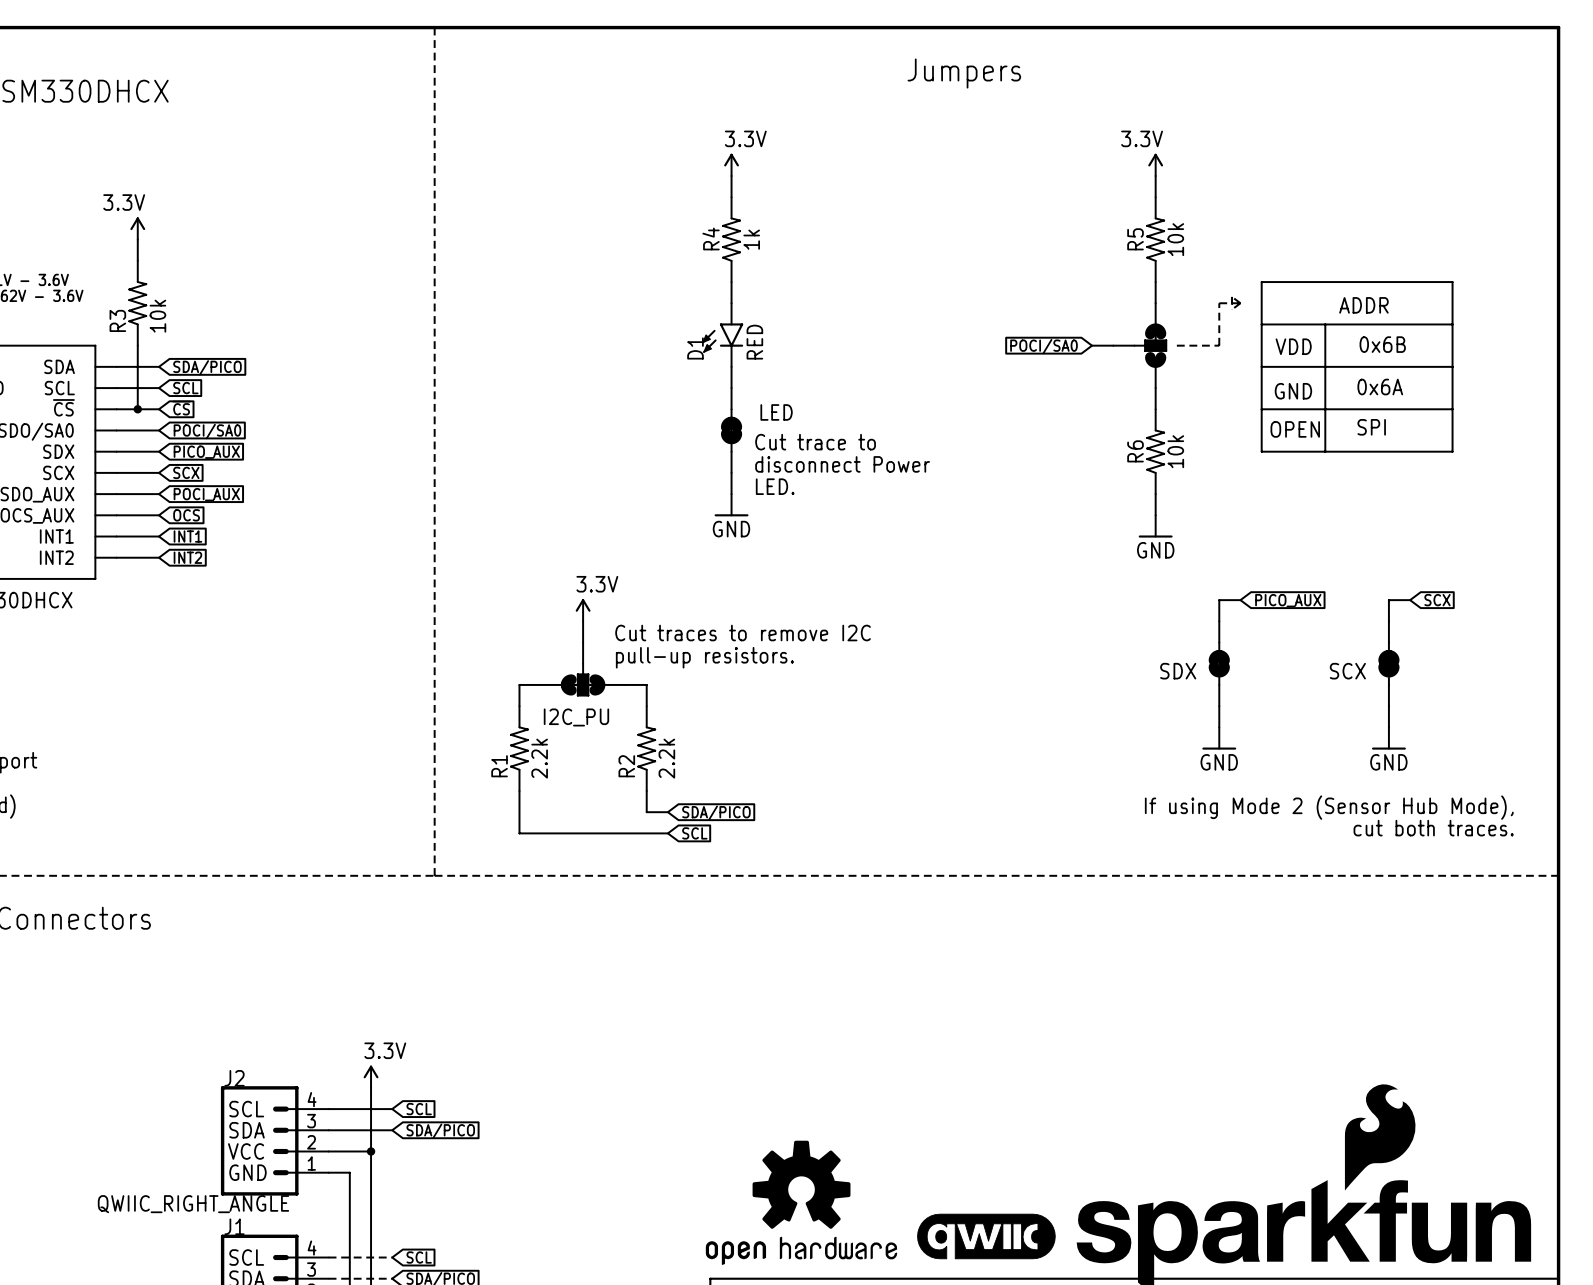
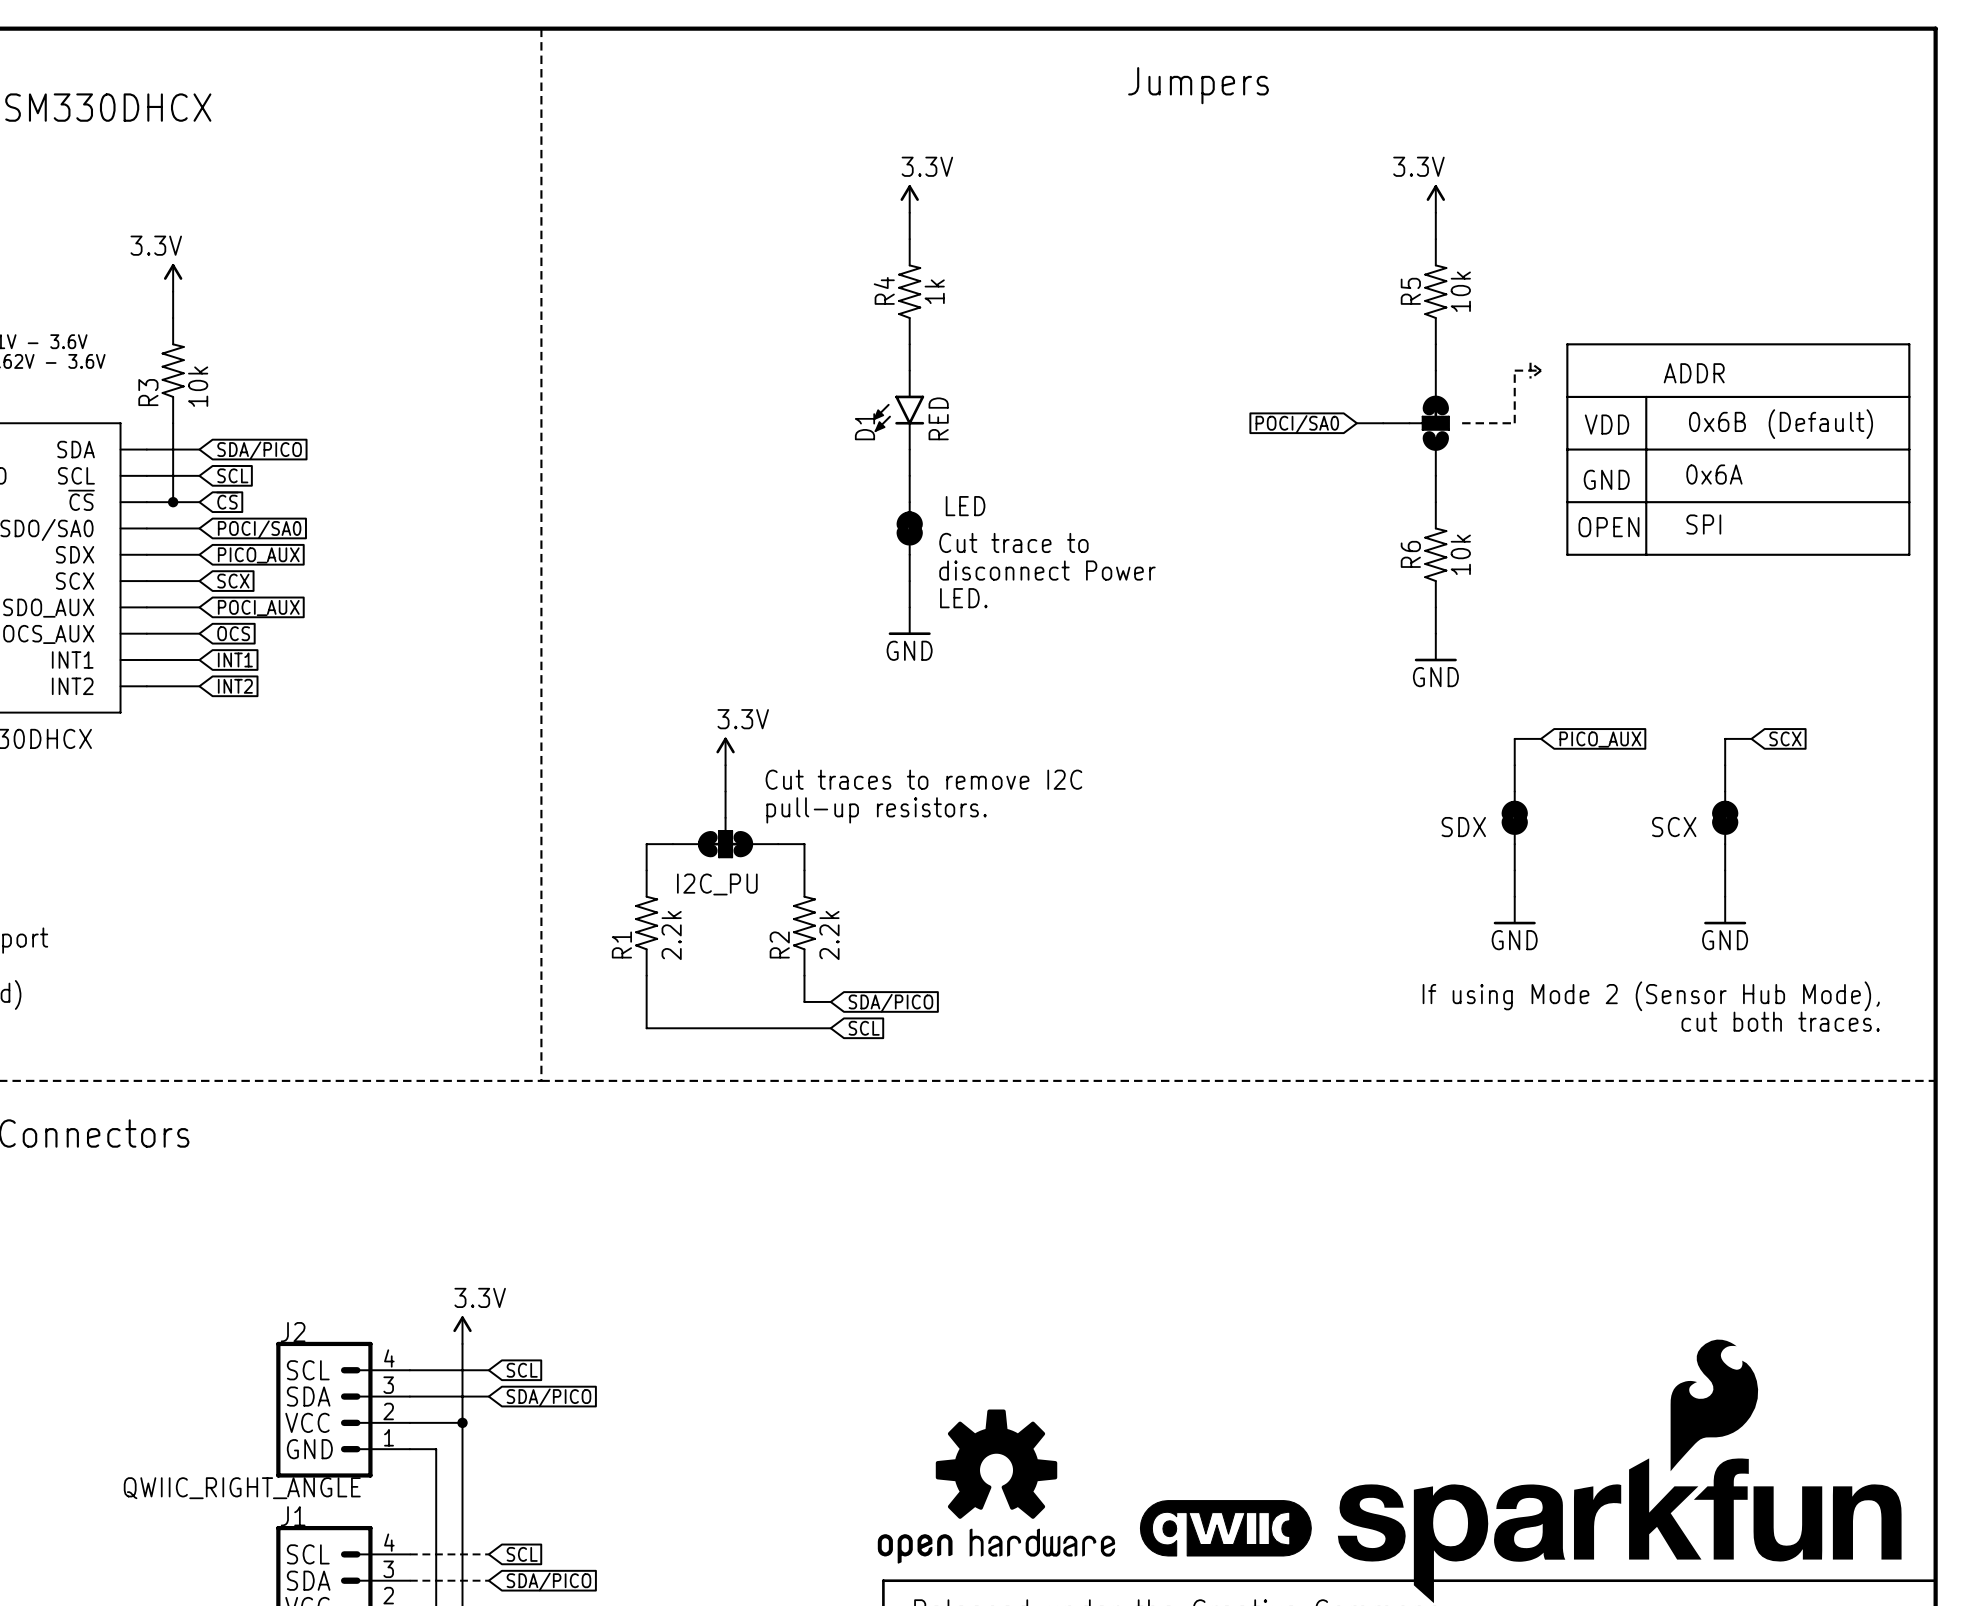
line: (1452, 282) (1452, 451) -> (1804, 344) (1909, 344) (1909, 554) (1804, 554)
line: none -> (1804, 396) (1909, 396)
text: none -> (Default) (1820, 424)
line: none -> (1804, 449) (1909, 449)
line: none -> (1804, 502) (1909, 502)

